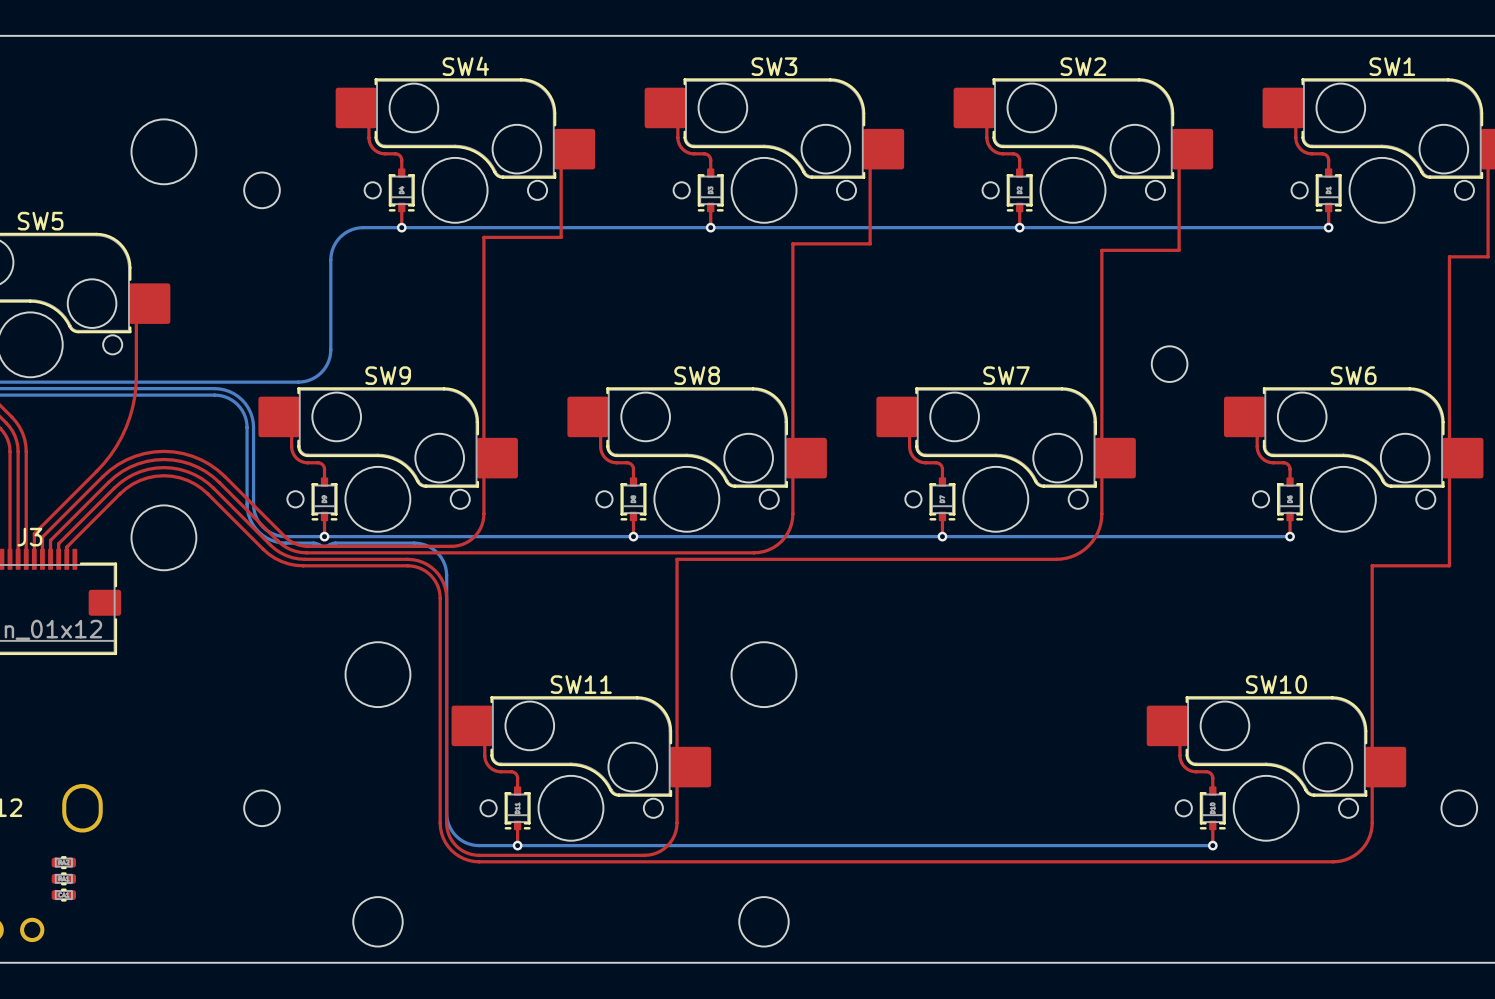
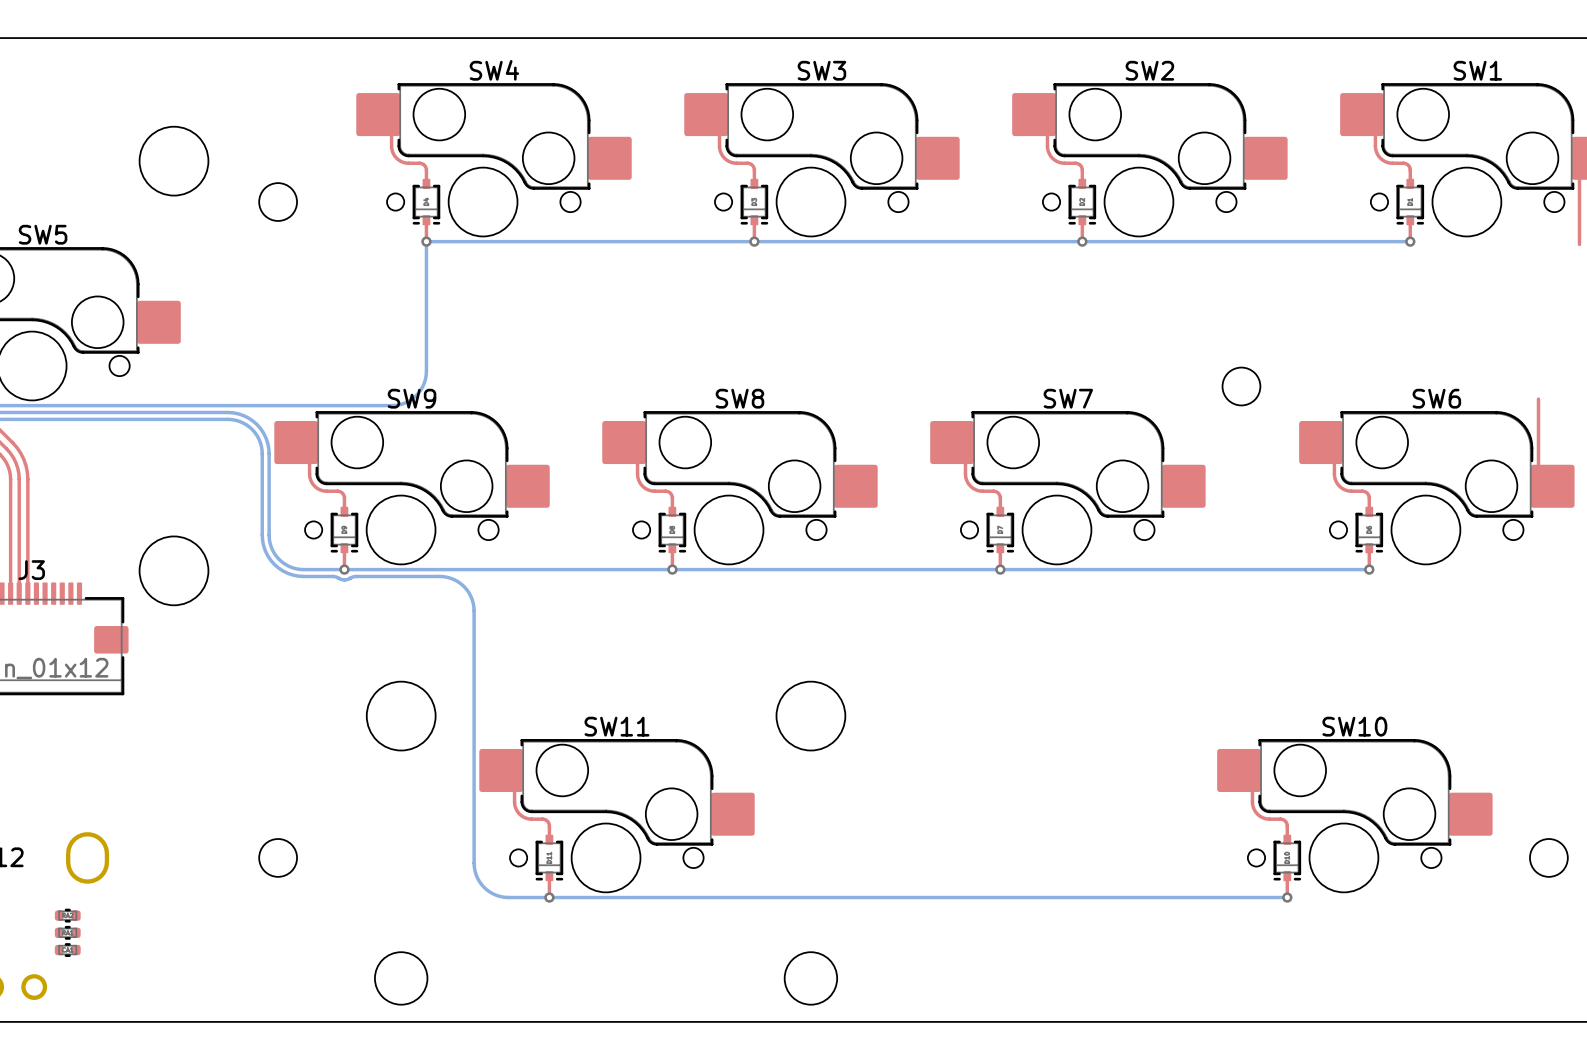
top track: (561, 148) (561, 237) (483, 237) (483, 513) (480, 527) (471, 539) (462, 544) (451, 546) (298, 544) (287, 538) (225, 476) (209, 464) (183, 453) (163, 451) (135, 456) (110, 470) (42, 537) (42, 559) -> none
top track: (870, 148) (870, 243) (792, 243) (792, 513) (787, 533) (773, 547) (753, 552) (301, 552) (281, 544) (219, 482) (205, 471) (189, 463) (163, 459) (138, 463) (115, 476) (50, 540) (50, 559) -> none
top track: (1179, 148) (1179, 250) (1101, 250) (1101, 513) (1099, 528) (1091, 542) (1076, 554) (1056, 559) (677, 559) (676, 827) (670, 842) (657, 852) (644, 855) (479, 855) (465, 852) (453, 843) (448, 833) (446, 822) (446, 593) (438, 574) (422, 562) (407, 559) (304, 559) (286, 555) (270, 545) (207, 482) (187, 471) (163, 467) (140, 471) (120, 482) (58, 543) (58, 559) -> none
bottom track: (401, 227) (356, 228) (345, 232) (335, 242) (330, 260) (330, 350) -> (426, 241) (426, 371) (421, 389) (410, 400) (395, 405) (316, 405)
top track: (1488, 230) (1488, 256) (1449, 256) (1449, 376) -> none
top track: (136, 303) (135, 386) (132, 407) (126, 427) (116, 446) (104, 463) (34, 533) (34, 559) -> none
bottom track: (330, 349) (328, 360) (321, 372) (312, 378) (298, 382) -> none
top track: (1449, 458) (1449, 565) (1372, 565) (1371, 827) (1368, 839) (1360, 850) (1350, 857) (1337, 861) (469, 860) (451, 850) (443, 837) (440, 827) (440, 598) (436, 584) (427, 572) (411, 566) (303, 565) (281, 561) (263, 549) (201, 488) (180, 477) (163, 475) (140, 480) (126, 488) (66, 547) (66, 559) -> none

